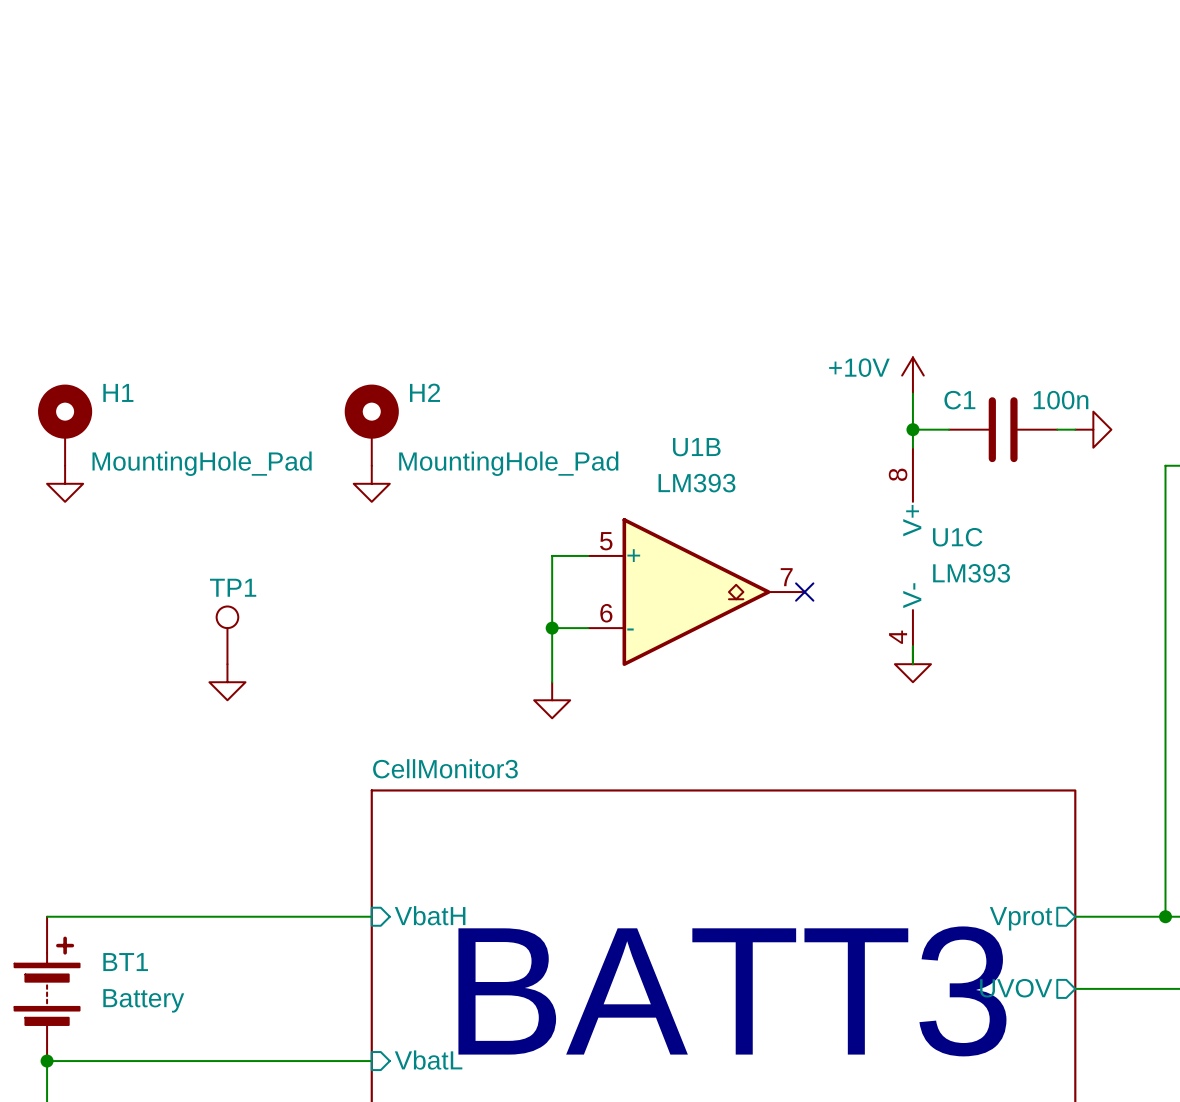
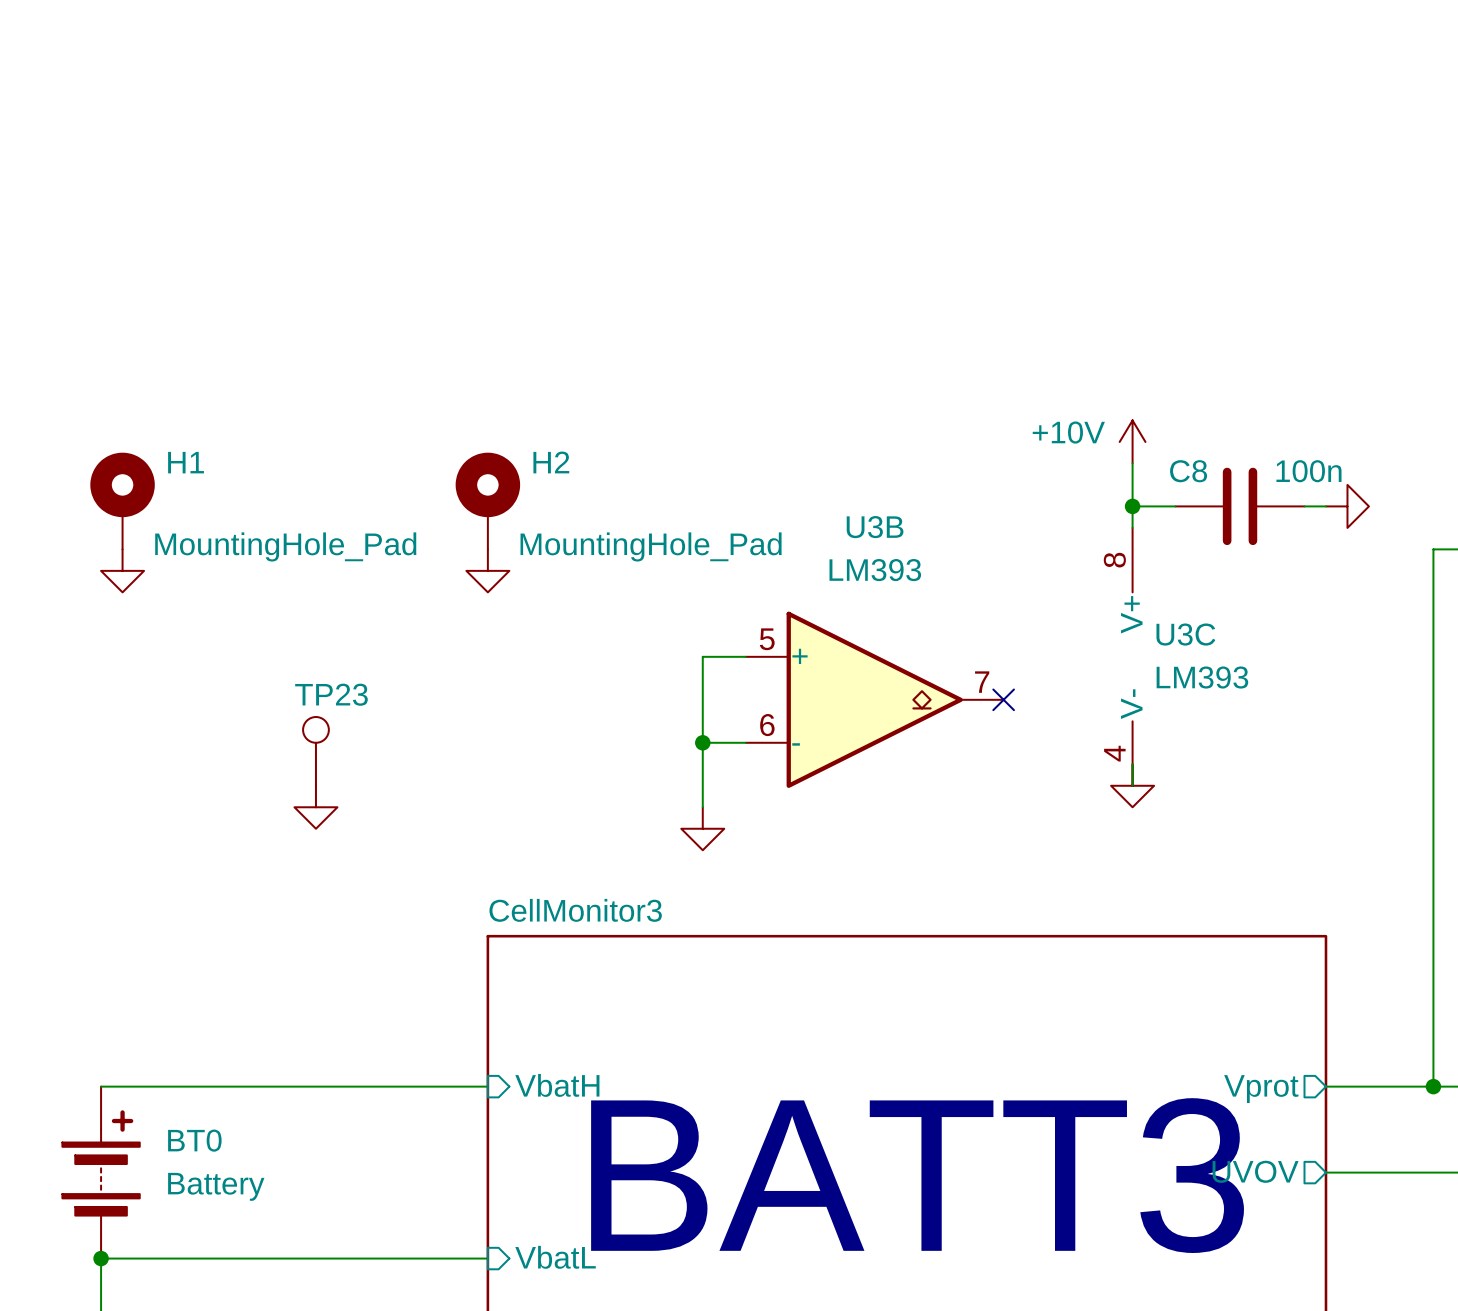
C1 name: C1 (959, 400) -> C8 (1188, 471)
U1B name: U1B (696, 447) -> U3B (875, 527)
U1C name: U1C (957, 537) -> U3C (1185, 634)
TP1 name: TP1 (233, 587) -> TP23 (331, 694)
BT1 name: BT1 (125, 962) -> BT0 (194, 1140)

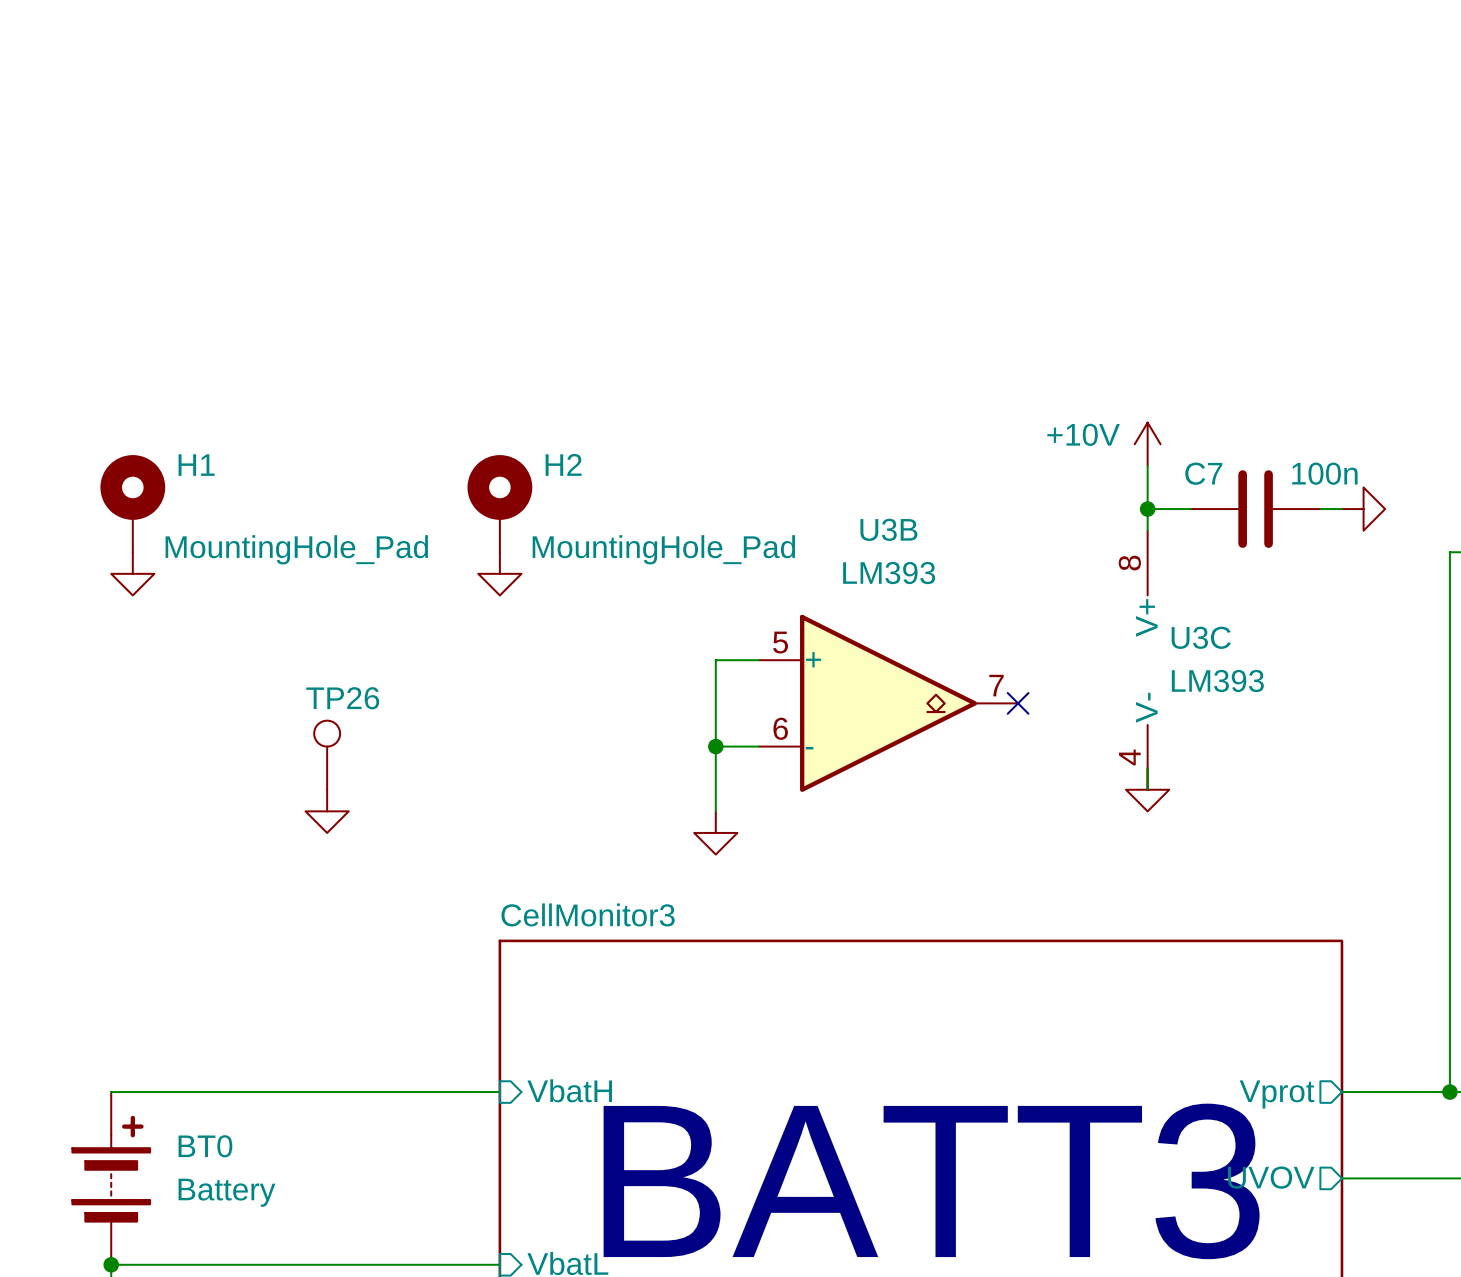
C8 name: C8 (1188, 471) -> C7 (1203, 473)
TP23 name: TP23 (331, 694) -> TP26 (342, 698)

